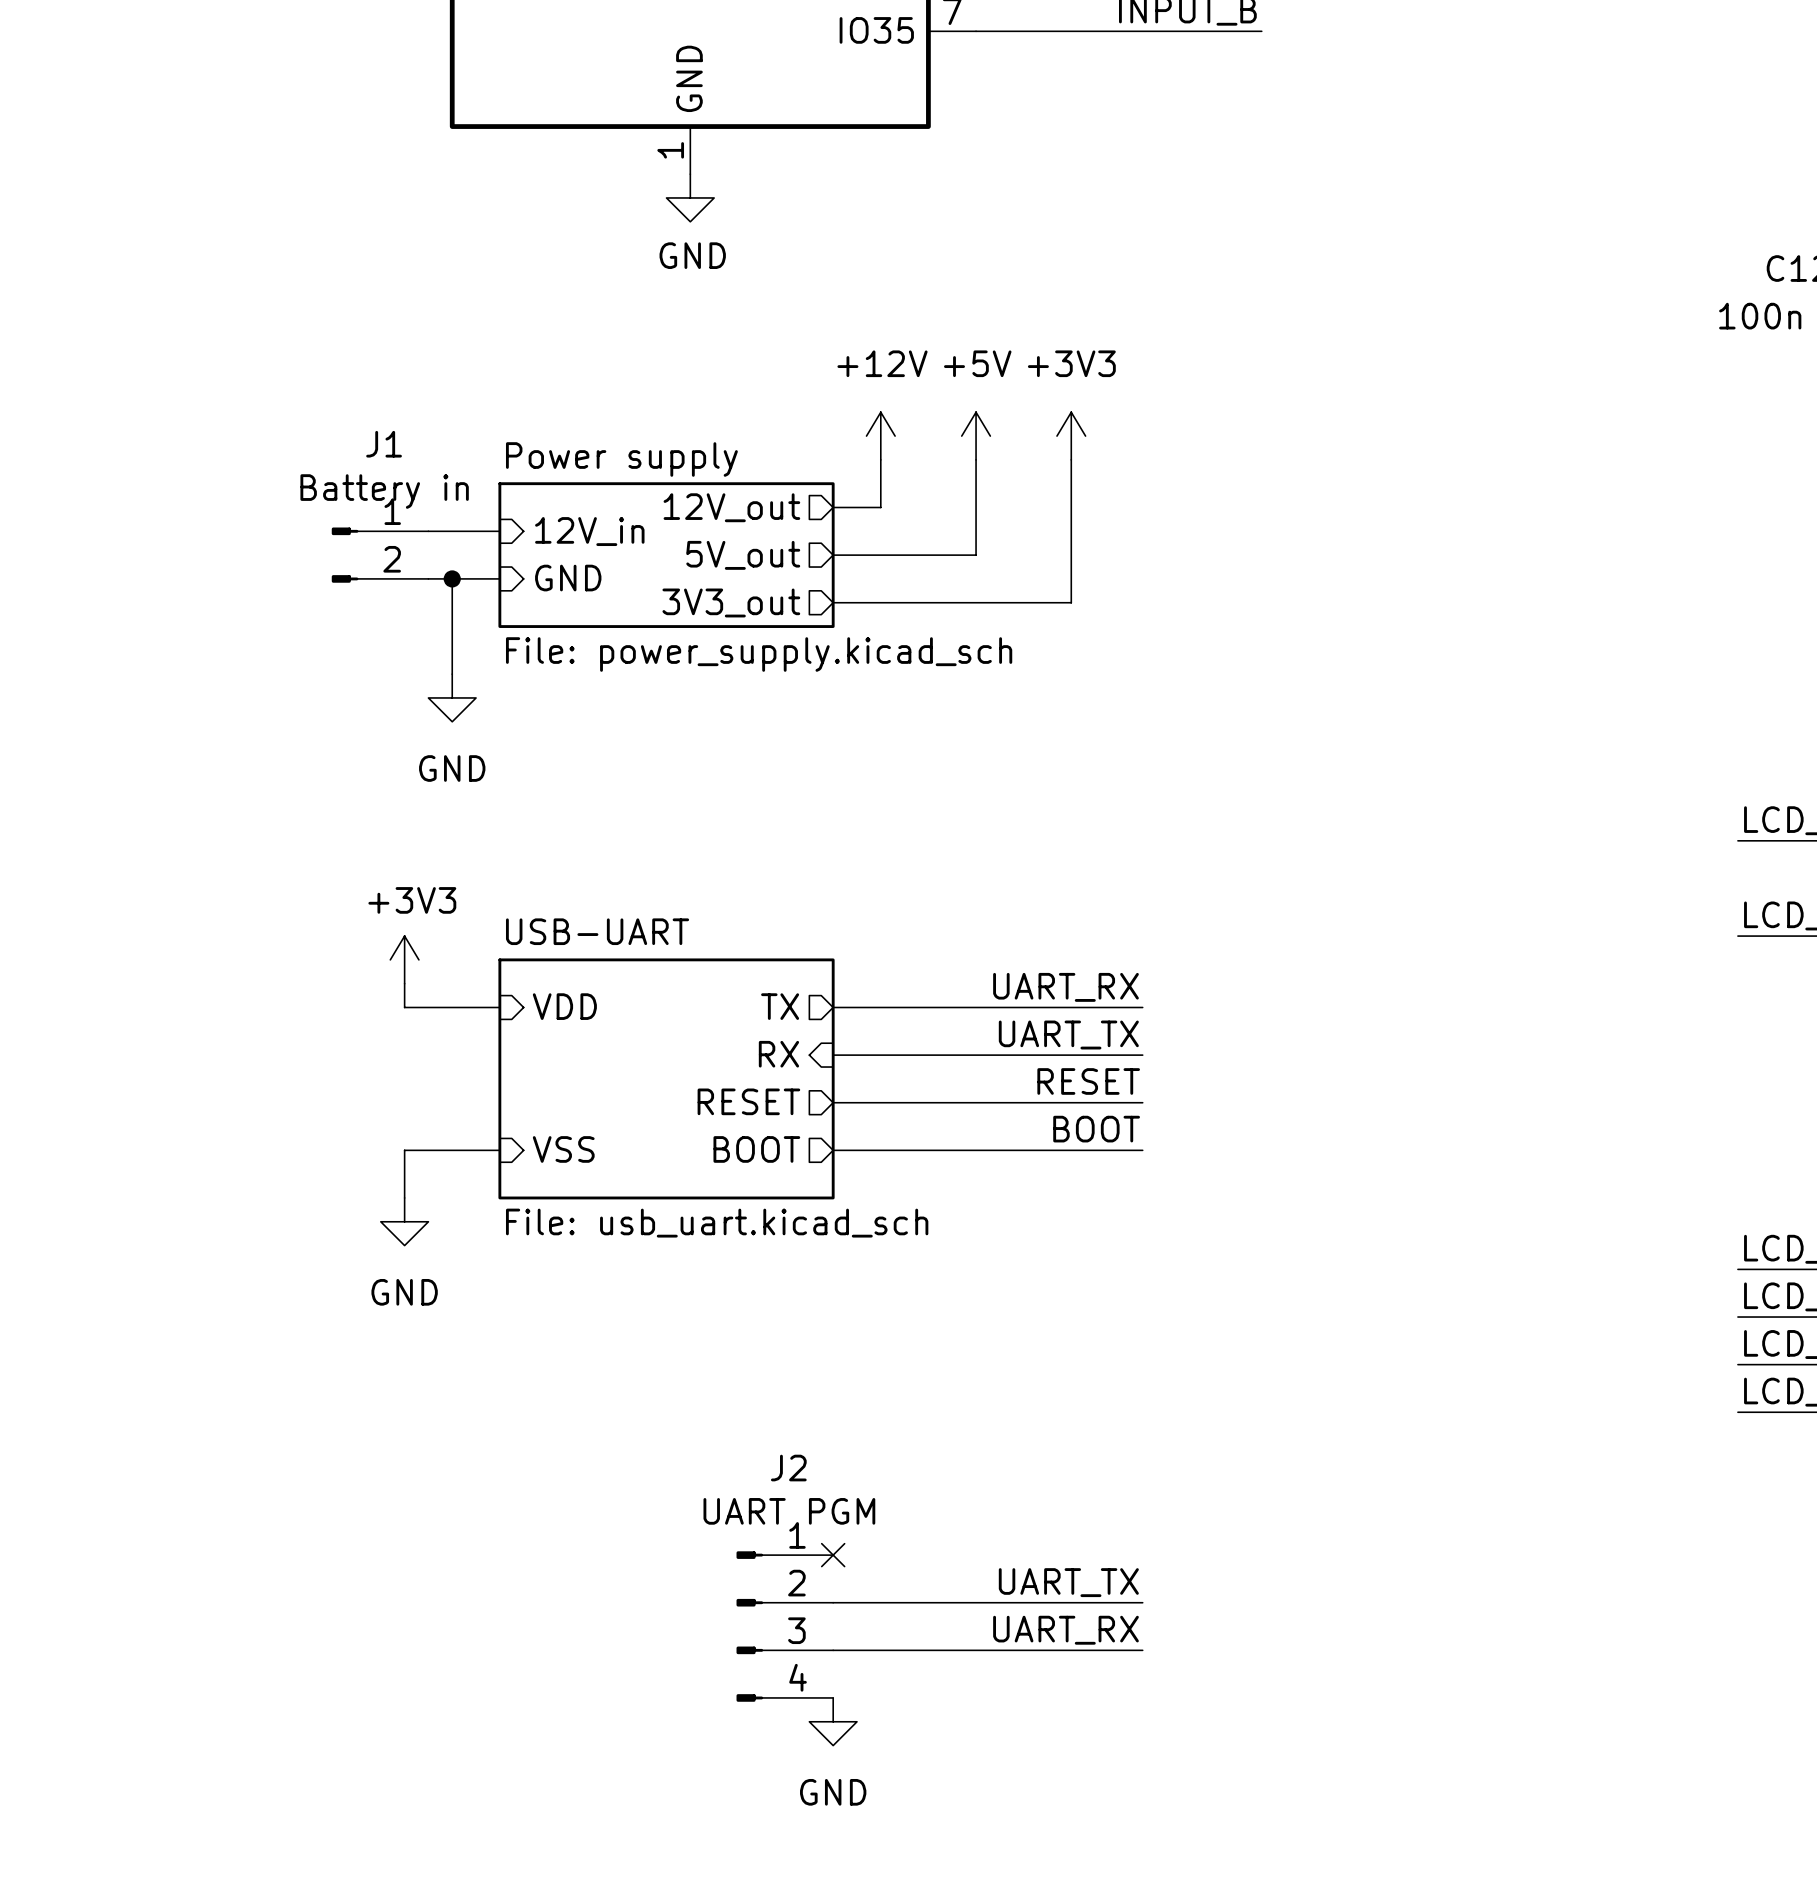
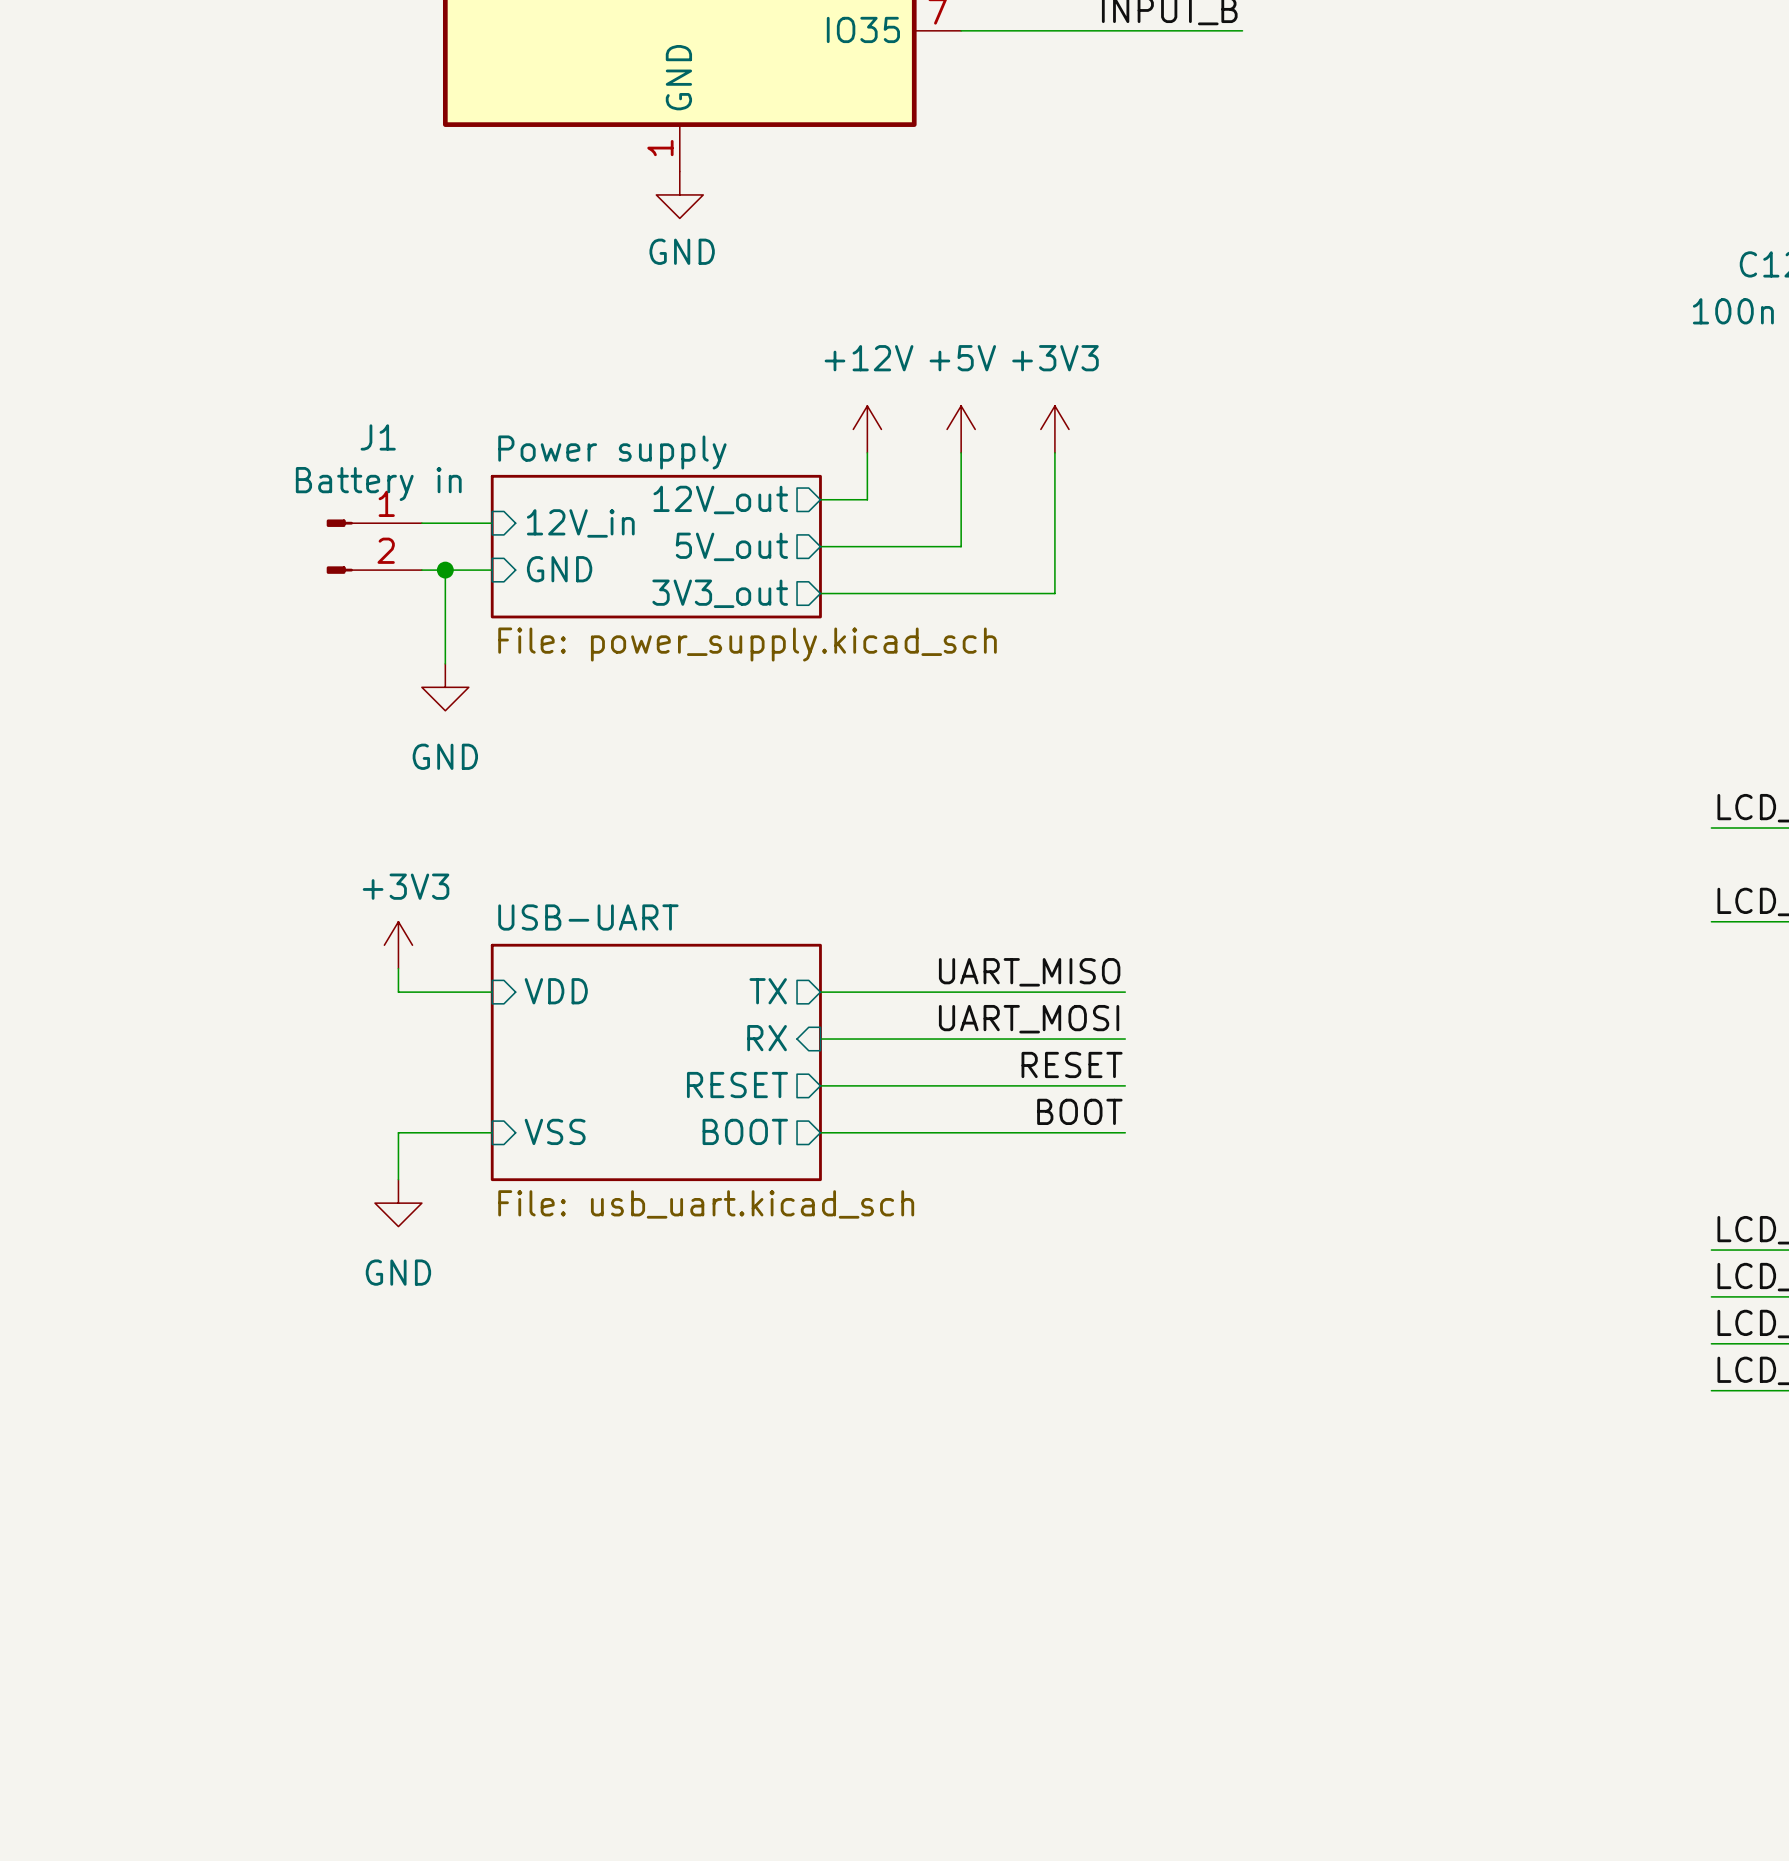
label: UART_RX (1066, 987) -> UART_MISO (1029, 972)
label: UART_TX (1068, 1035) -> UART_MOSI (1029, 1019)
no-connect mark: (833, 1555) -> none
label: UART_TX (1068, 1582) -> none
wire: (833, 1602) (1142, 1602) -> none
J2: UART PGM (784, 1626) -> none
label: UART_RX (1066, 1630) -> none
wire: (833, 1650) (1142, 1650) -> none
power symbol: GND (833, 1721) -> none

